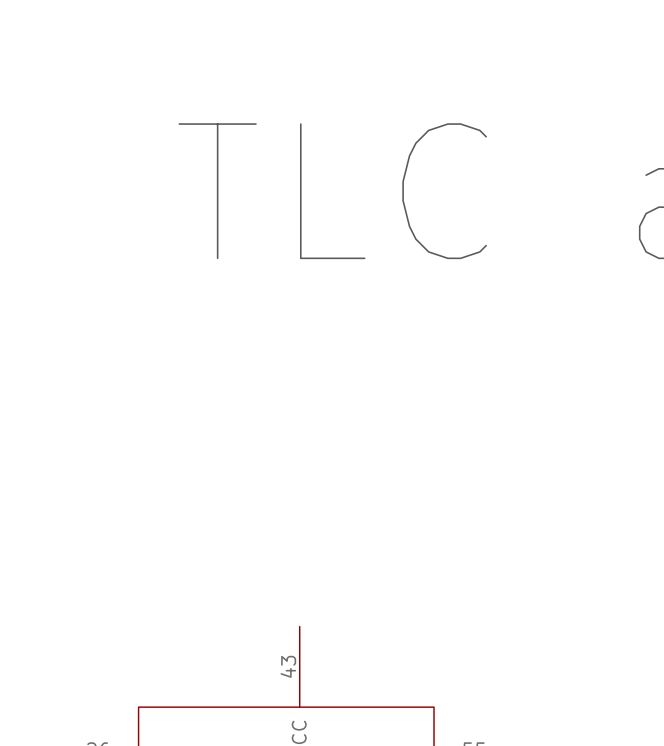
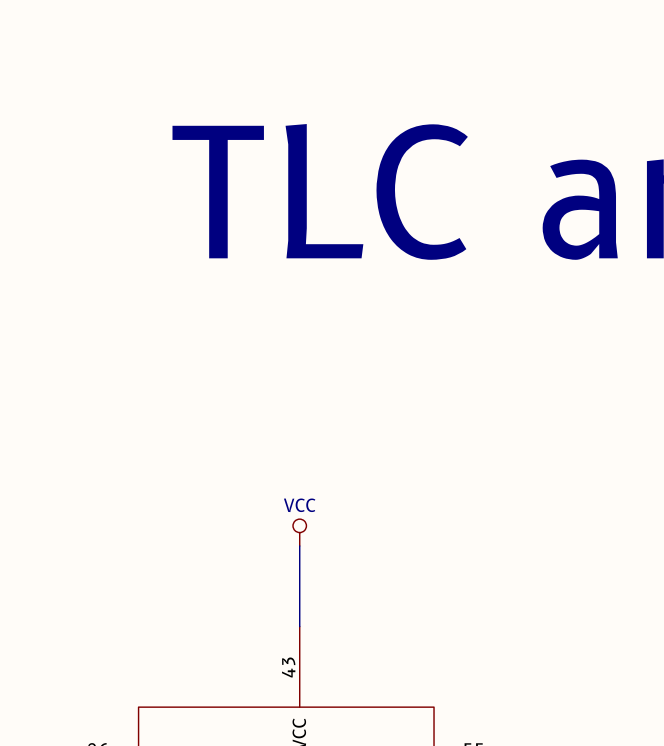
power symbol: none -> VCC (299, 532)
wire: none -> (299, 545) (299, 626)

